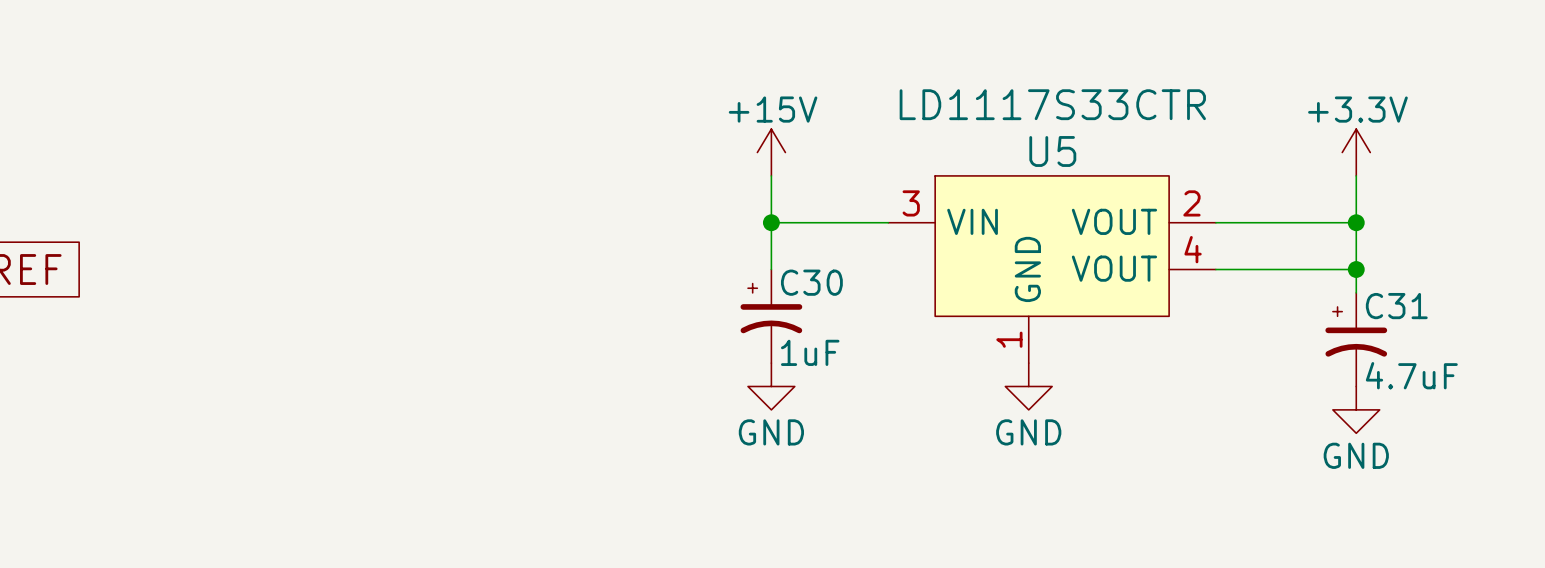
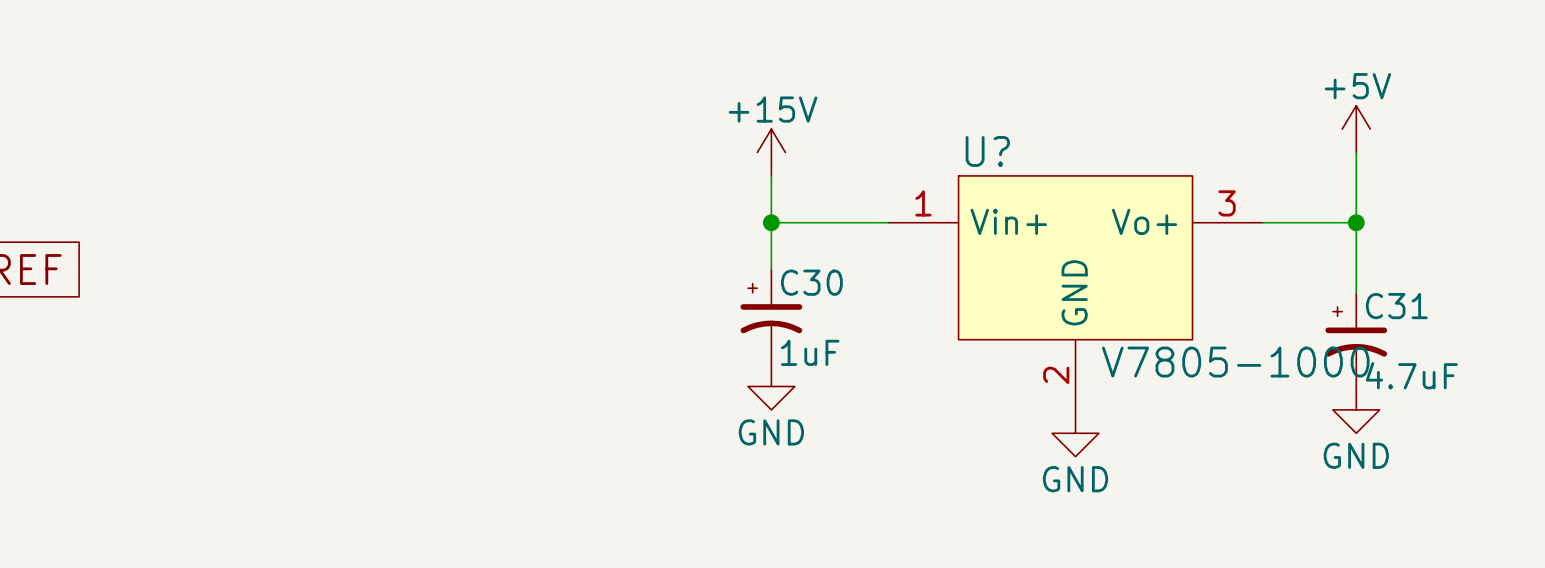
power symbol: none -> +5V (1356, 129)
power symbol: +3.3V (1356, 152) -> none
U5: LD1117S33CTR (1052, 269) -> none
wire: (1215, 269) (1356, 269) -> none
junction: (1356, 269) -> none
U?: none -> V7805-1000 (1075, 292)
power symbol position: GND (1028, 386) -> GND (1075, 433)

